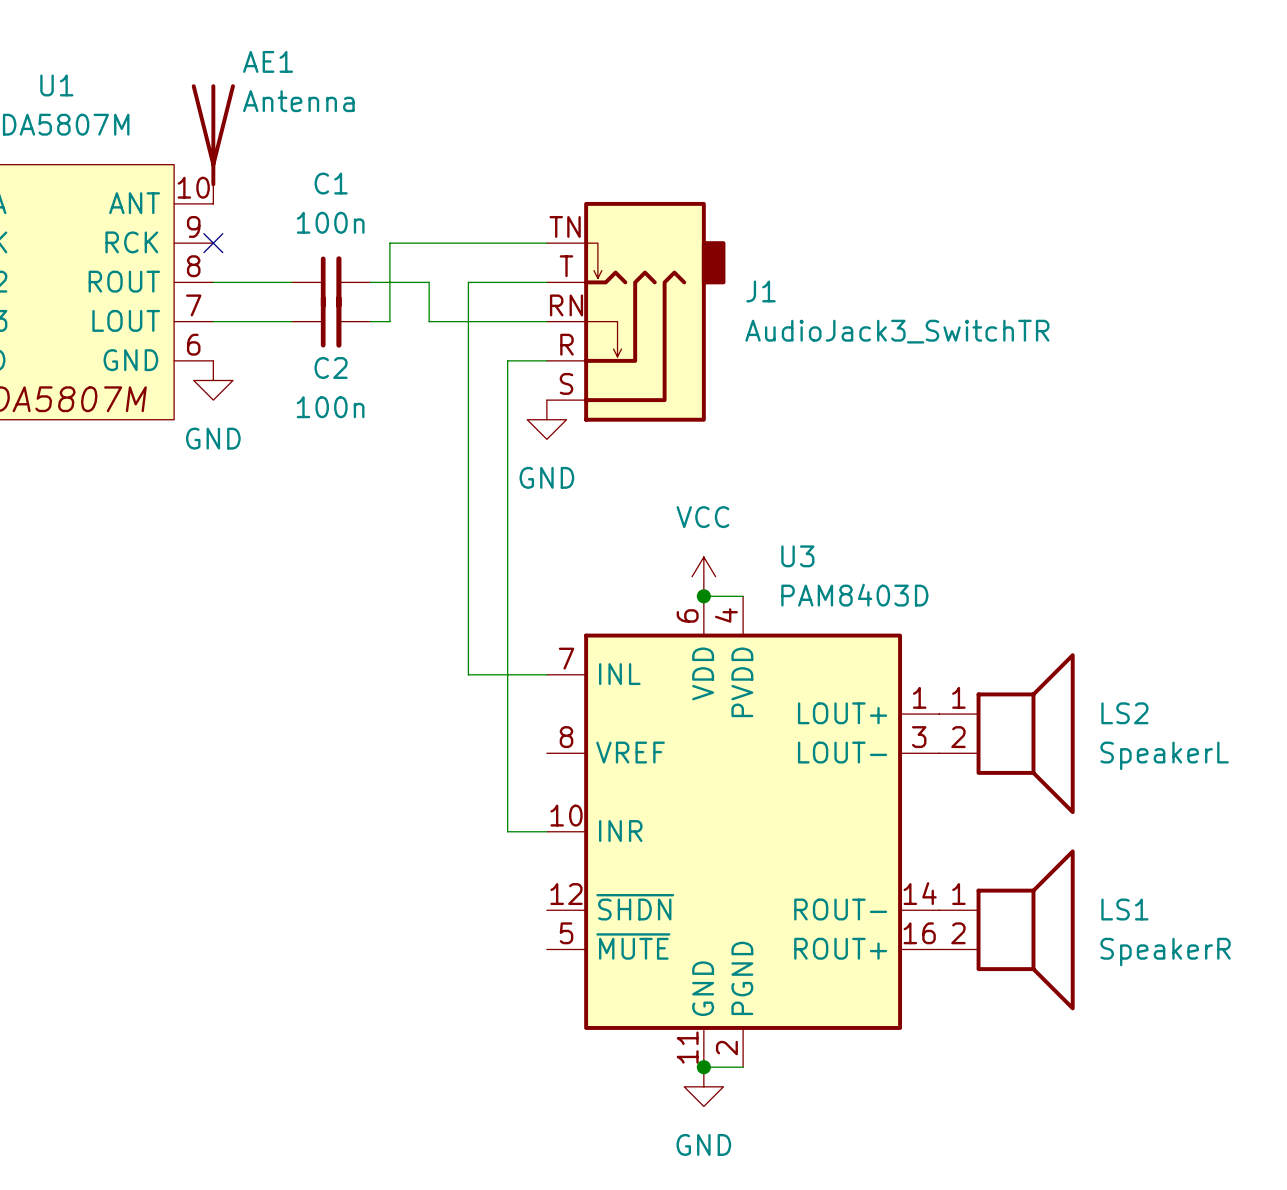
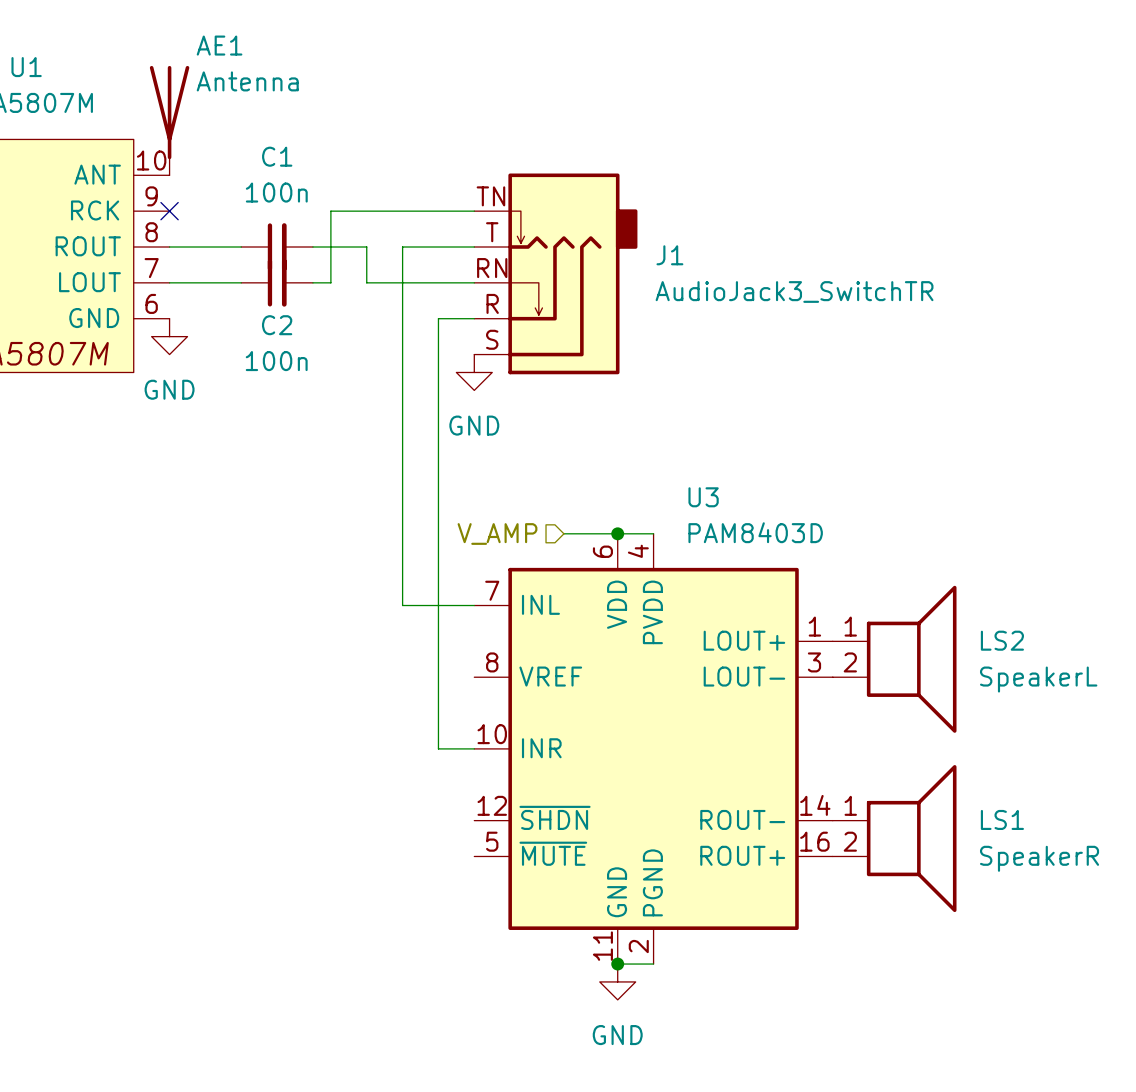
power symbol: VCC (703, 576) -> none
hierarchical label: none -> V_AMP (497, 533)
wire: none -> (563, 533) (617, 533)

